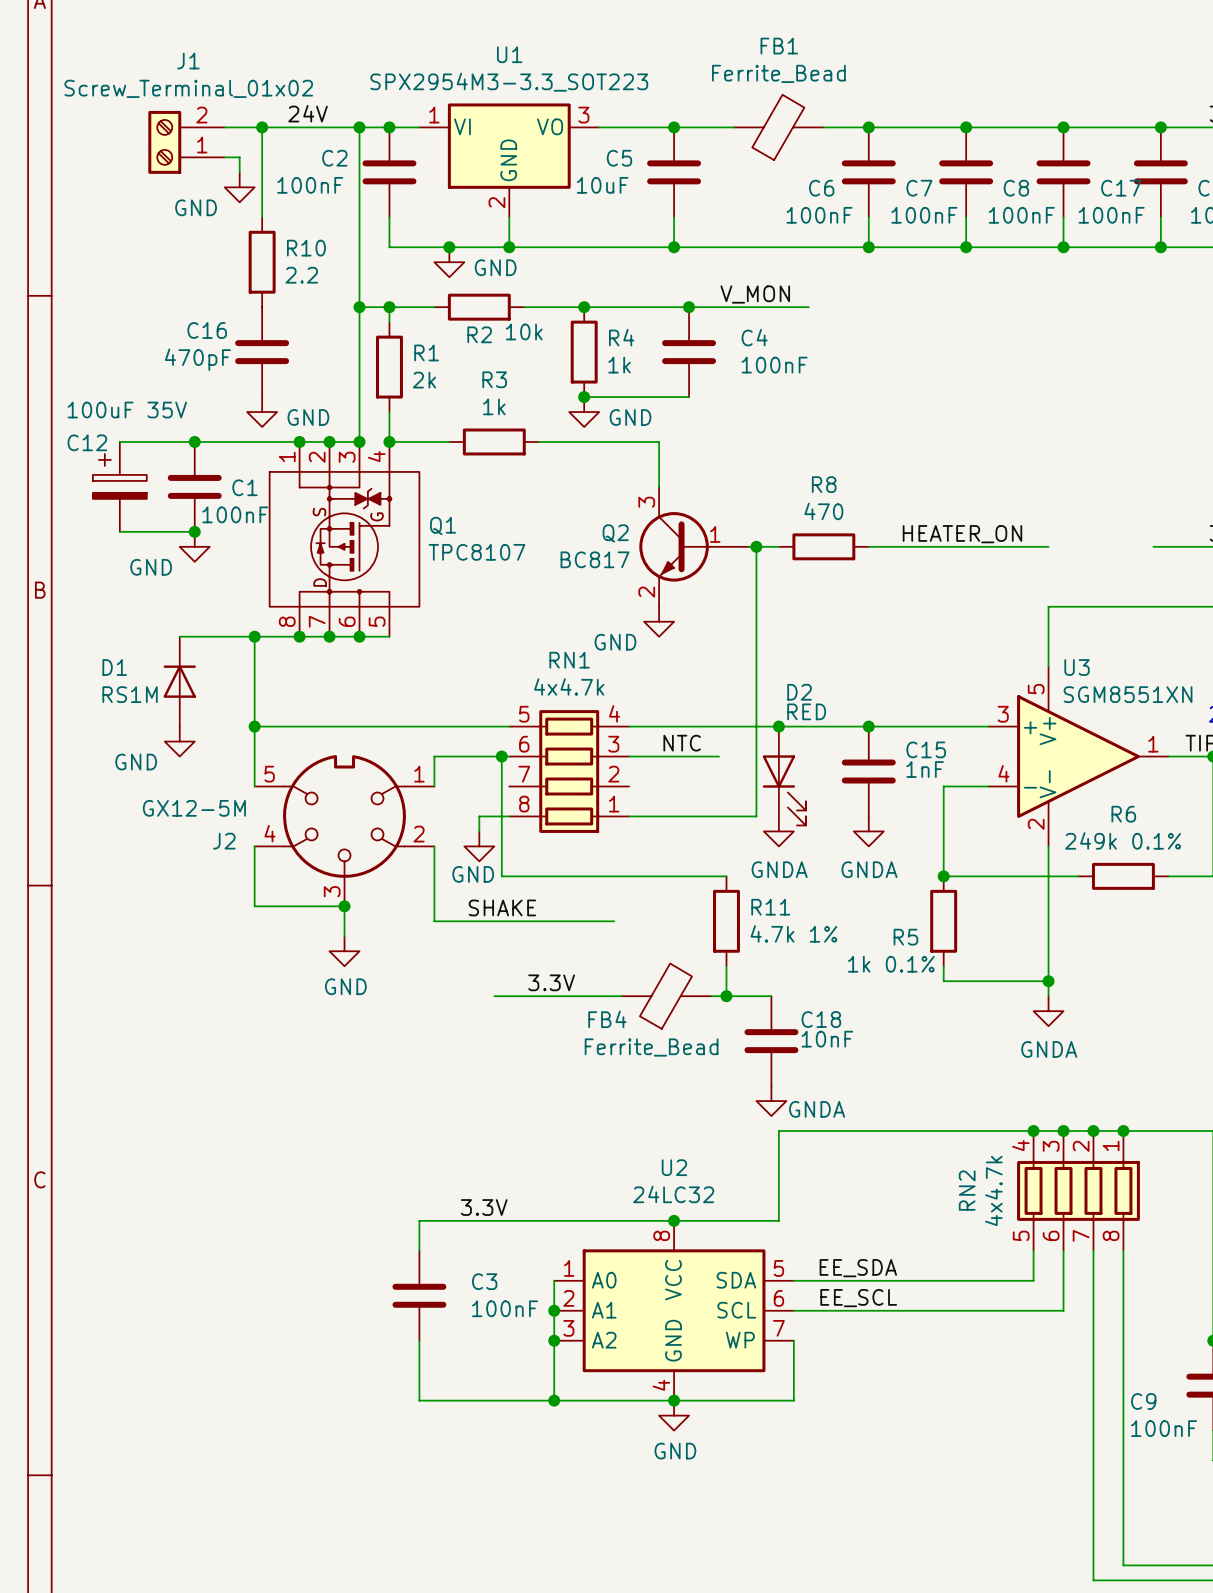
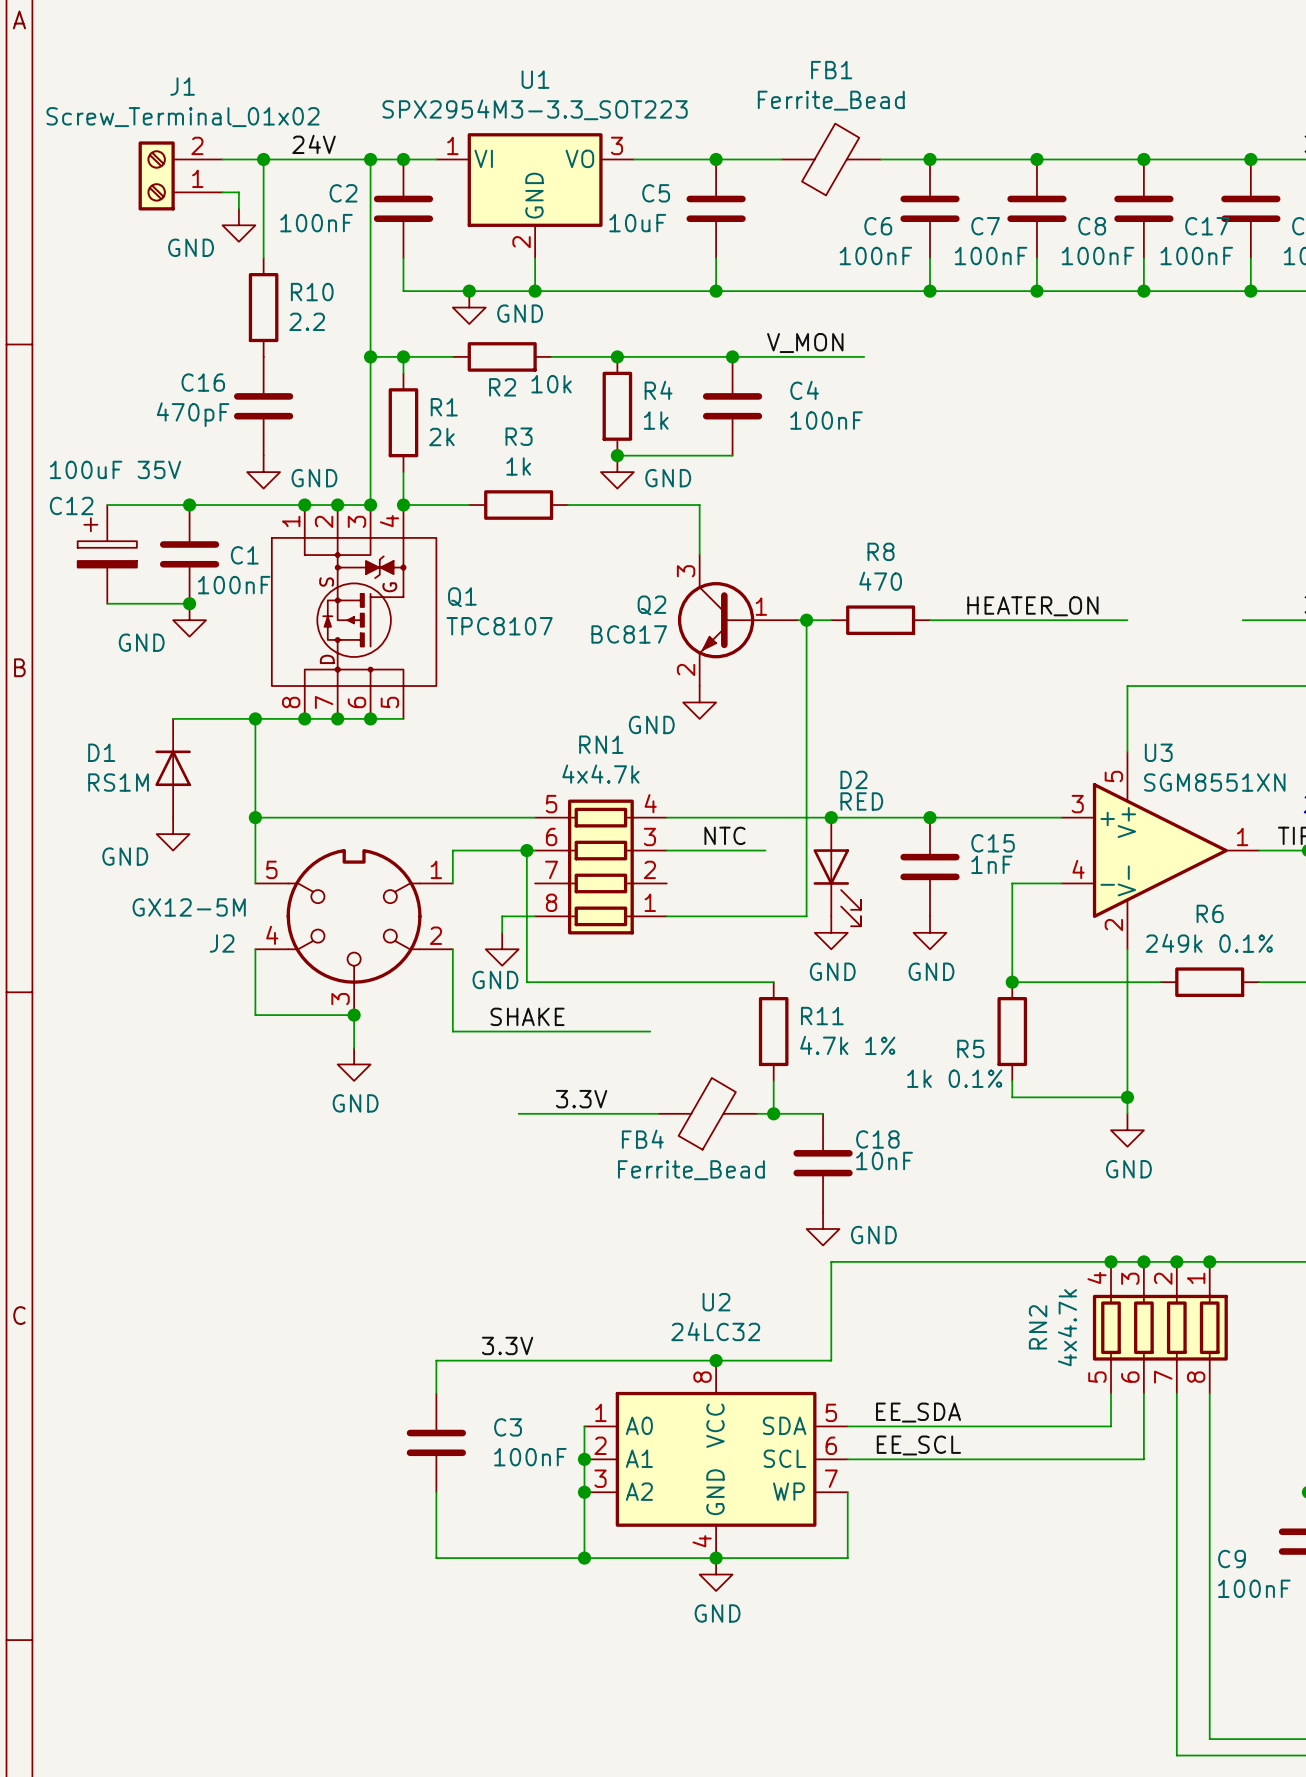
power symbol: GNDA (778, 831) -> GND (831, 932)
power symbol: GNDA (868, 831) -> GND (930, 932)
power symbol: GNDA (1048, 1011) -> GND (1127, 1130)
power symbol: GNDA (771, 1101) -> GND (823, 1229)

